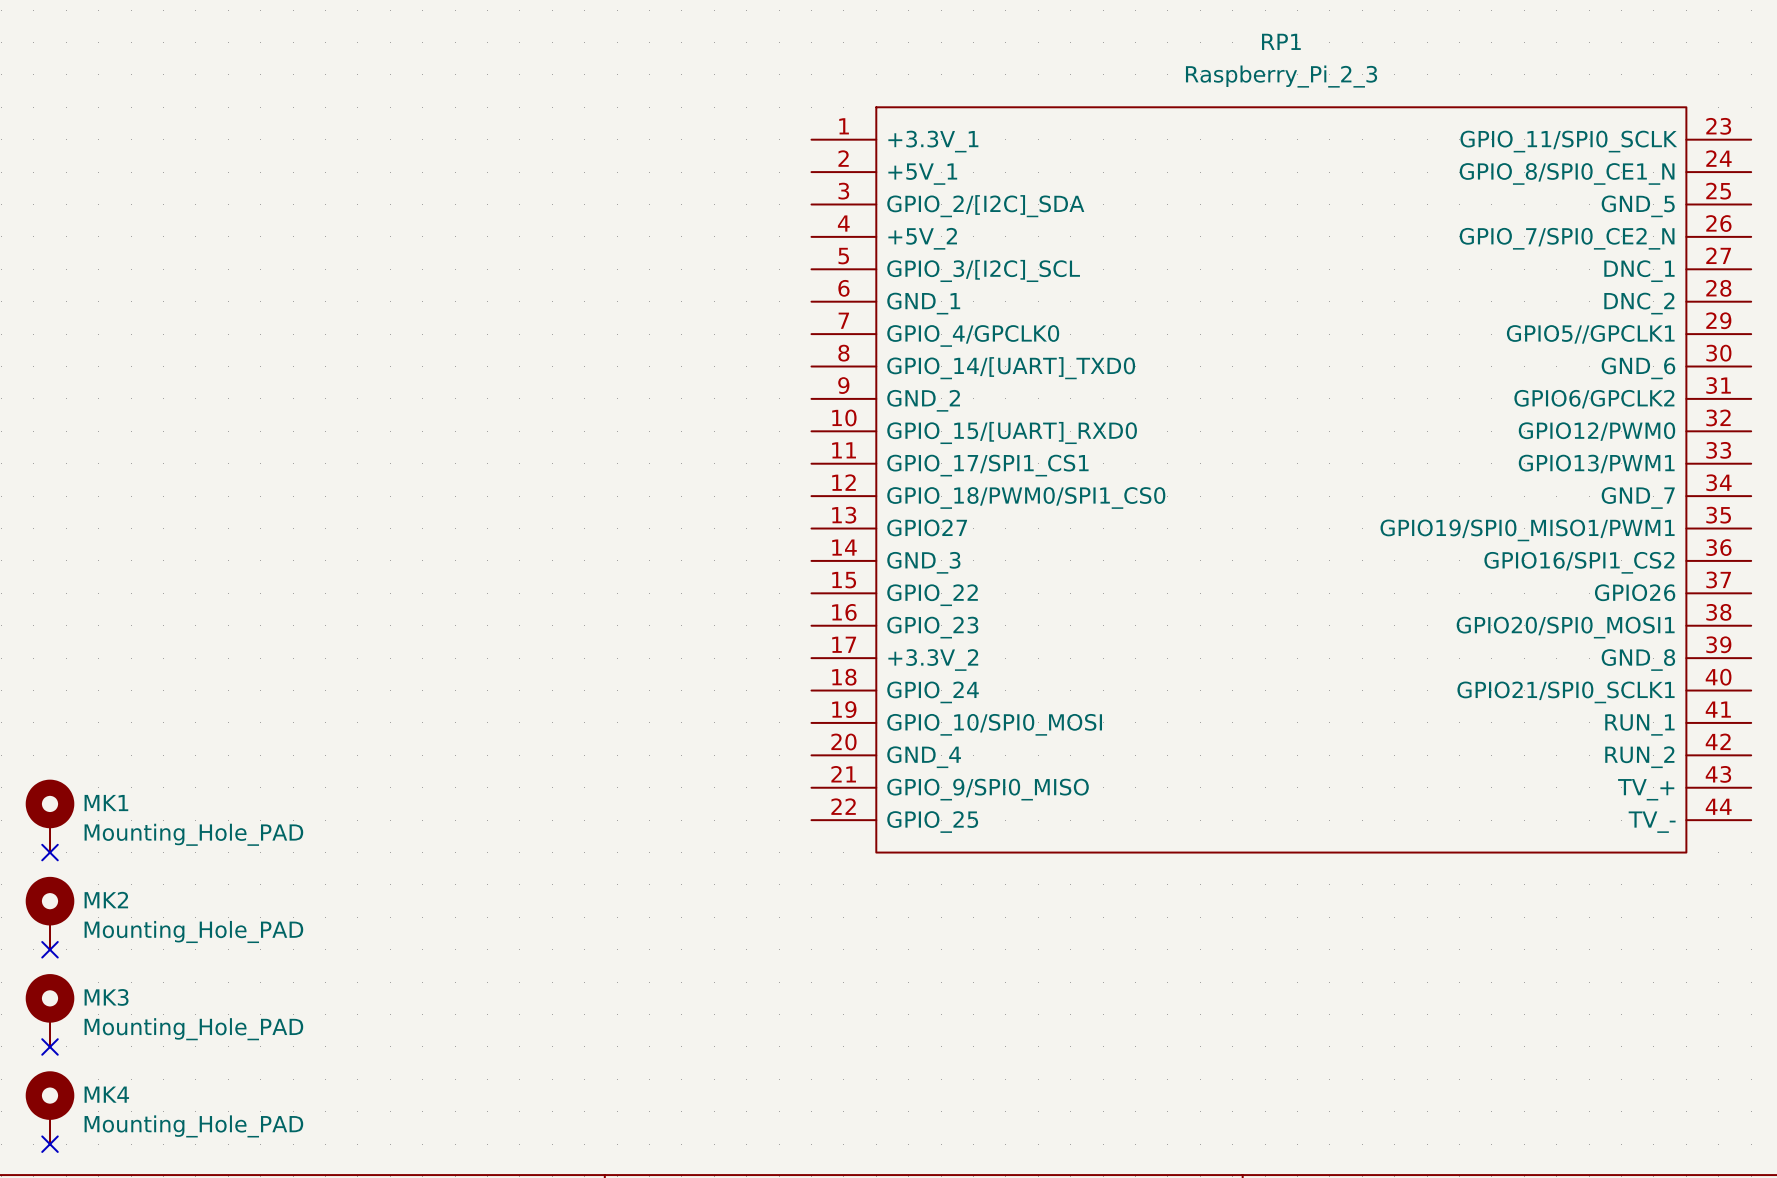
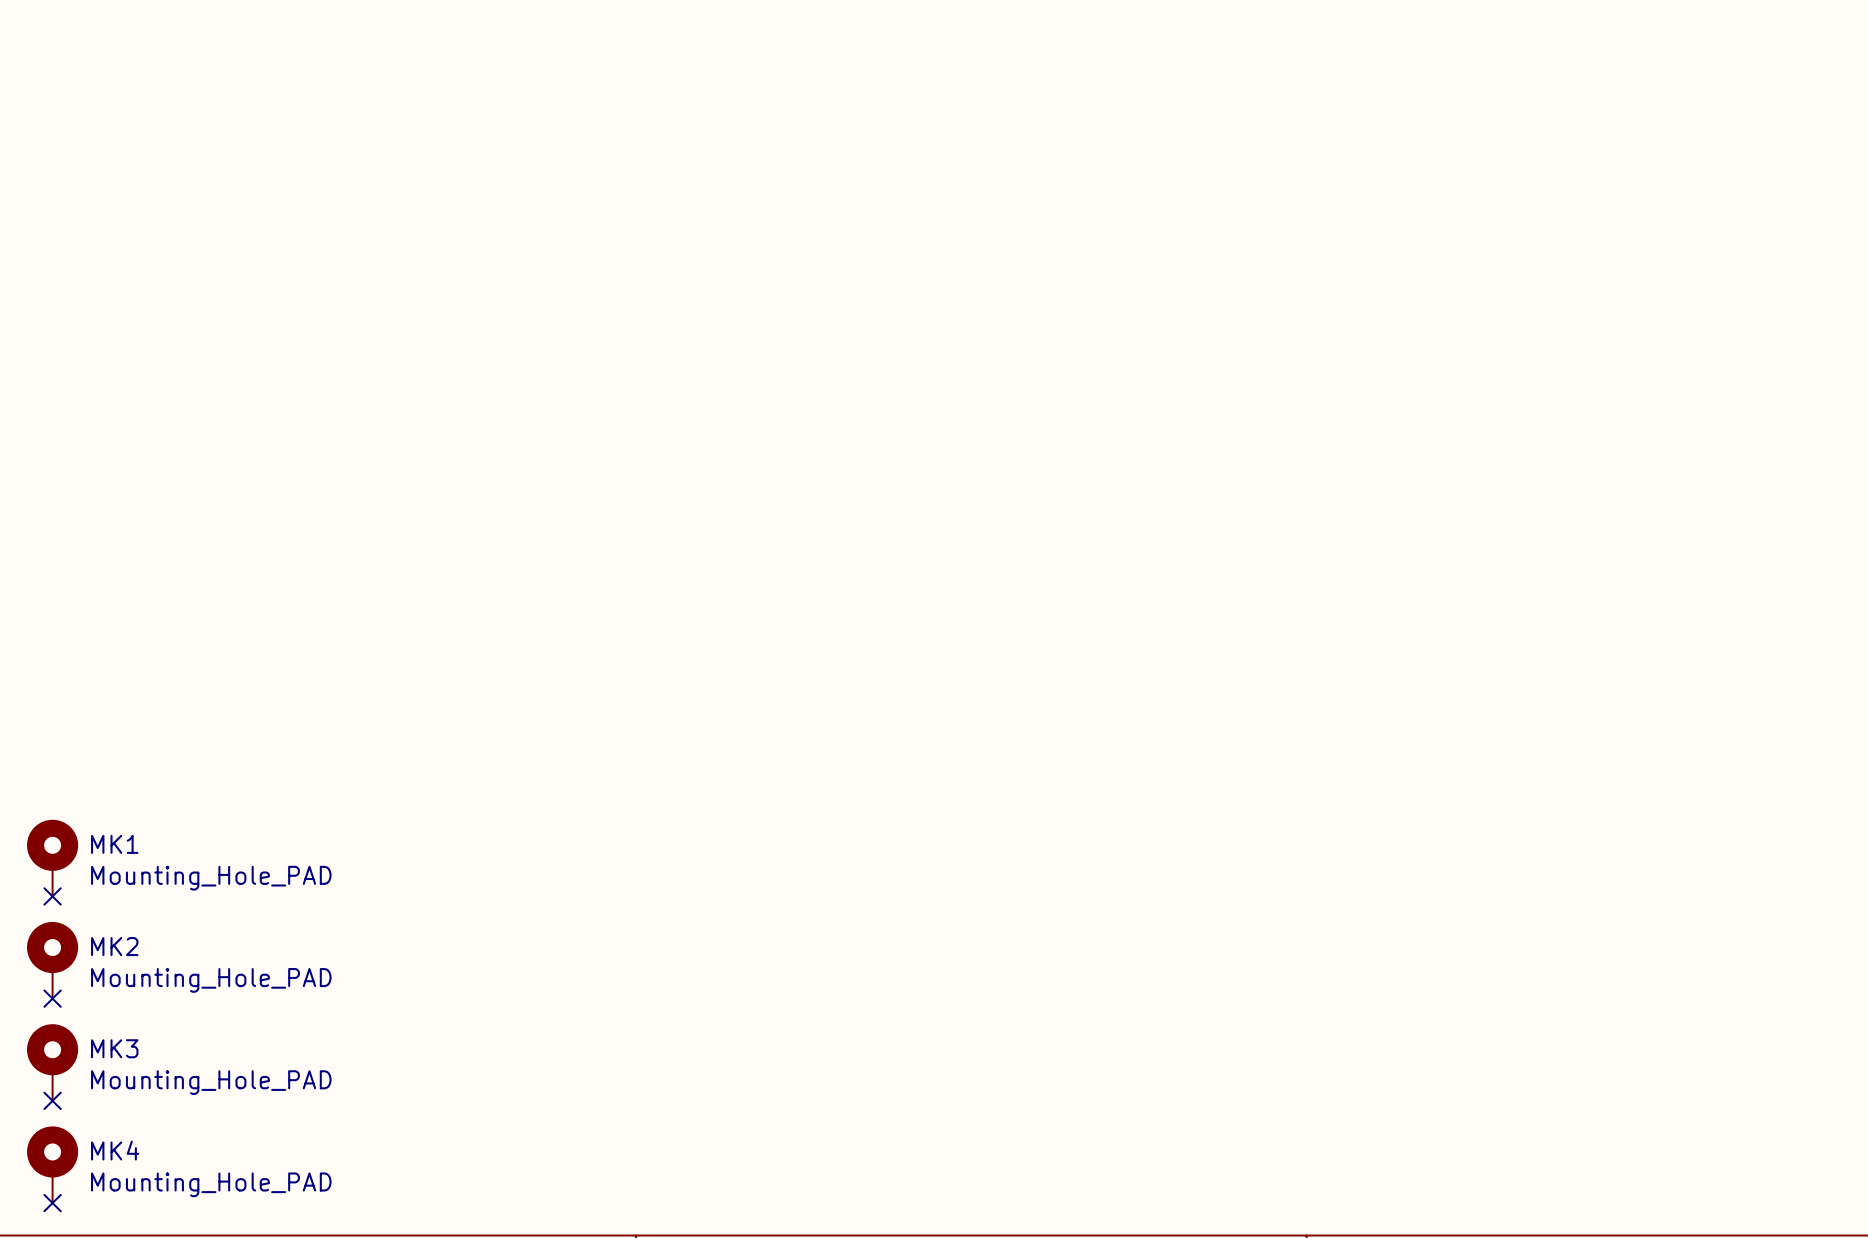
RP1: Raspberry_Pi_2_3 (1281, 479) -> none

